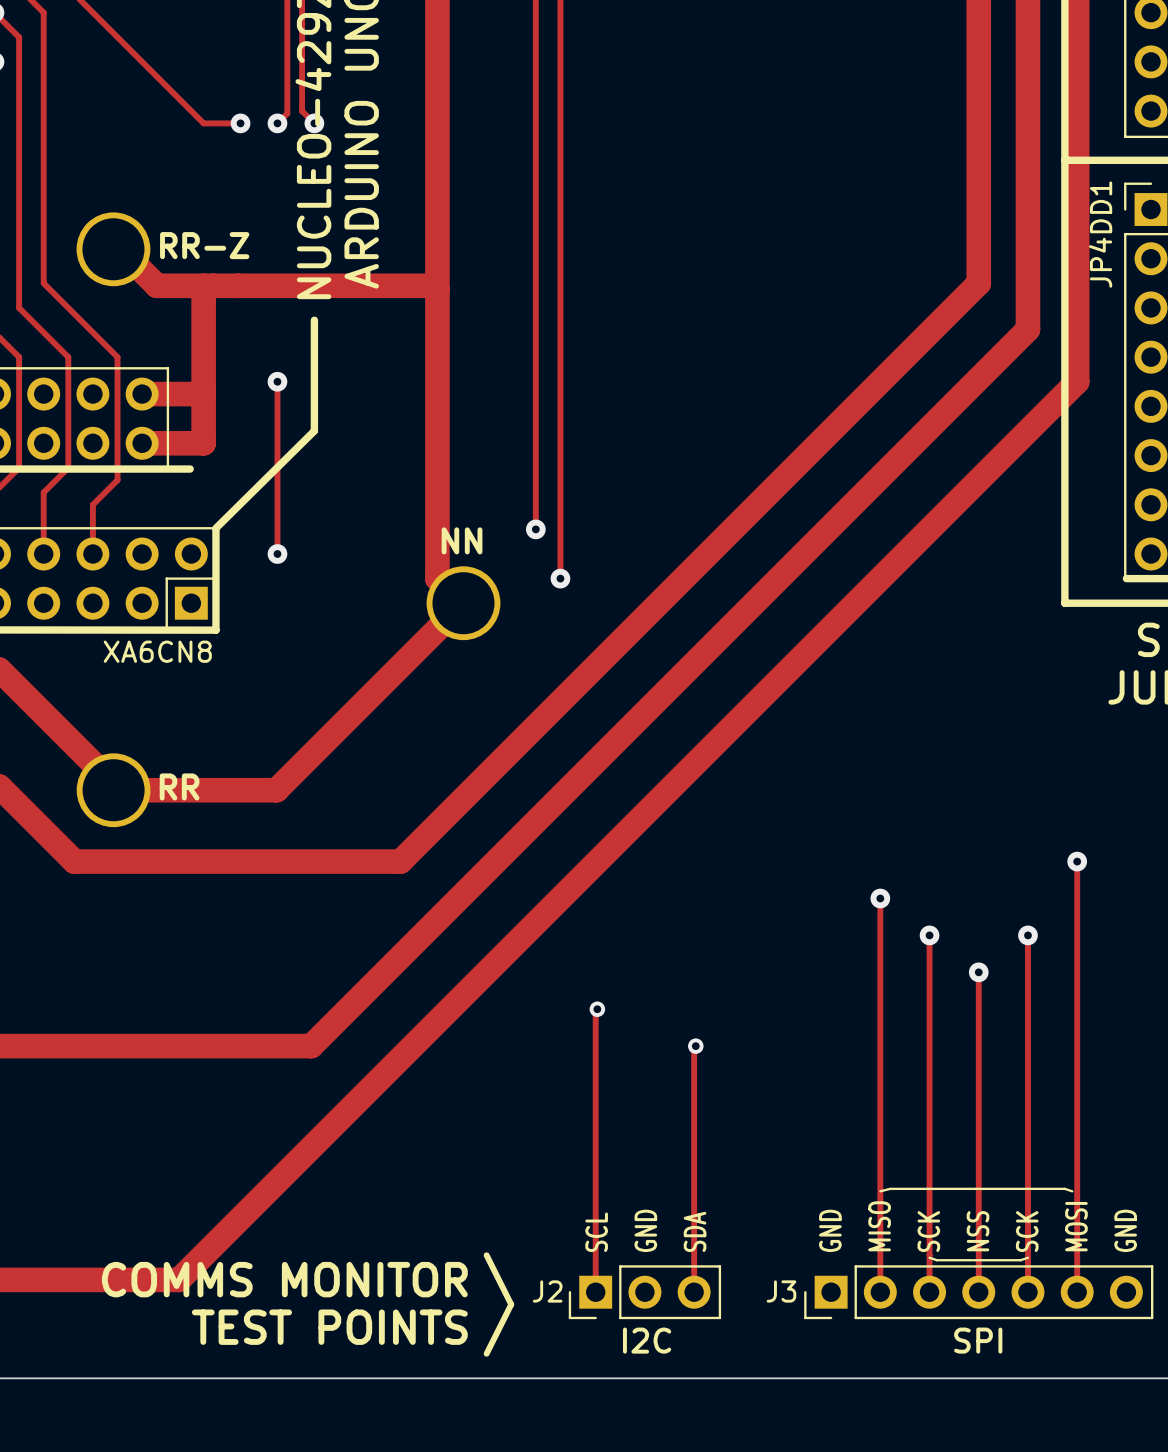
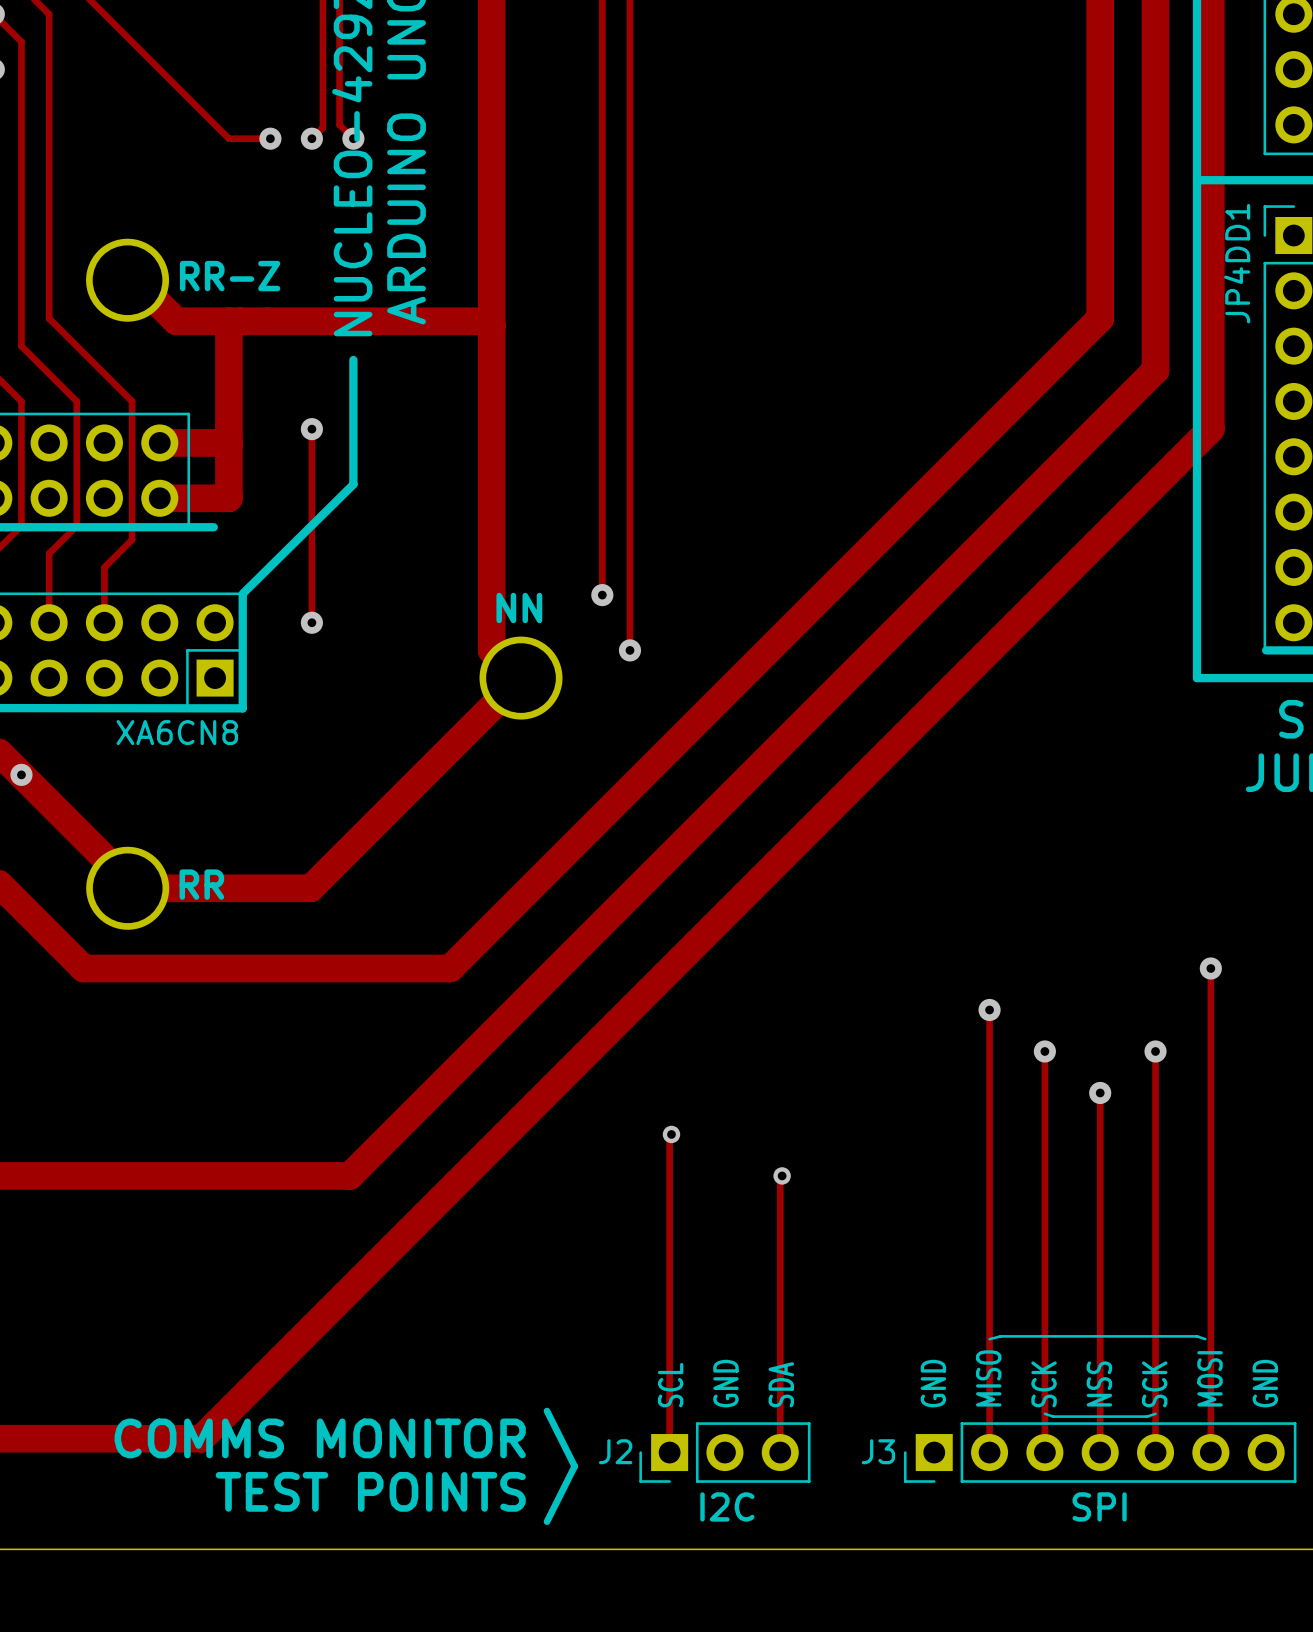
via: none -> (21, 774)

